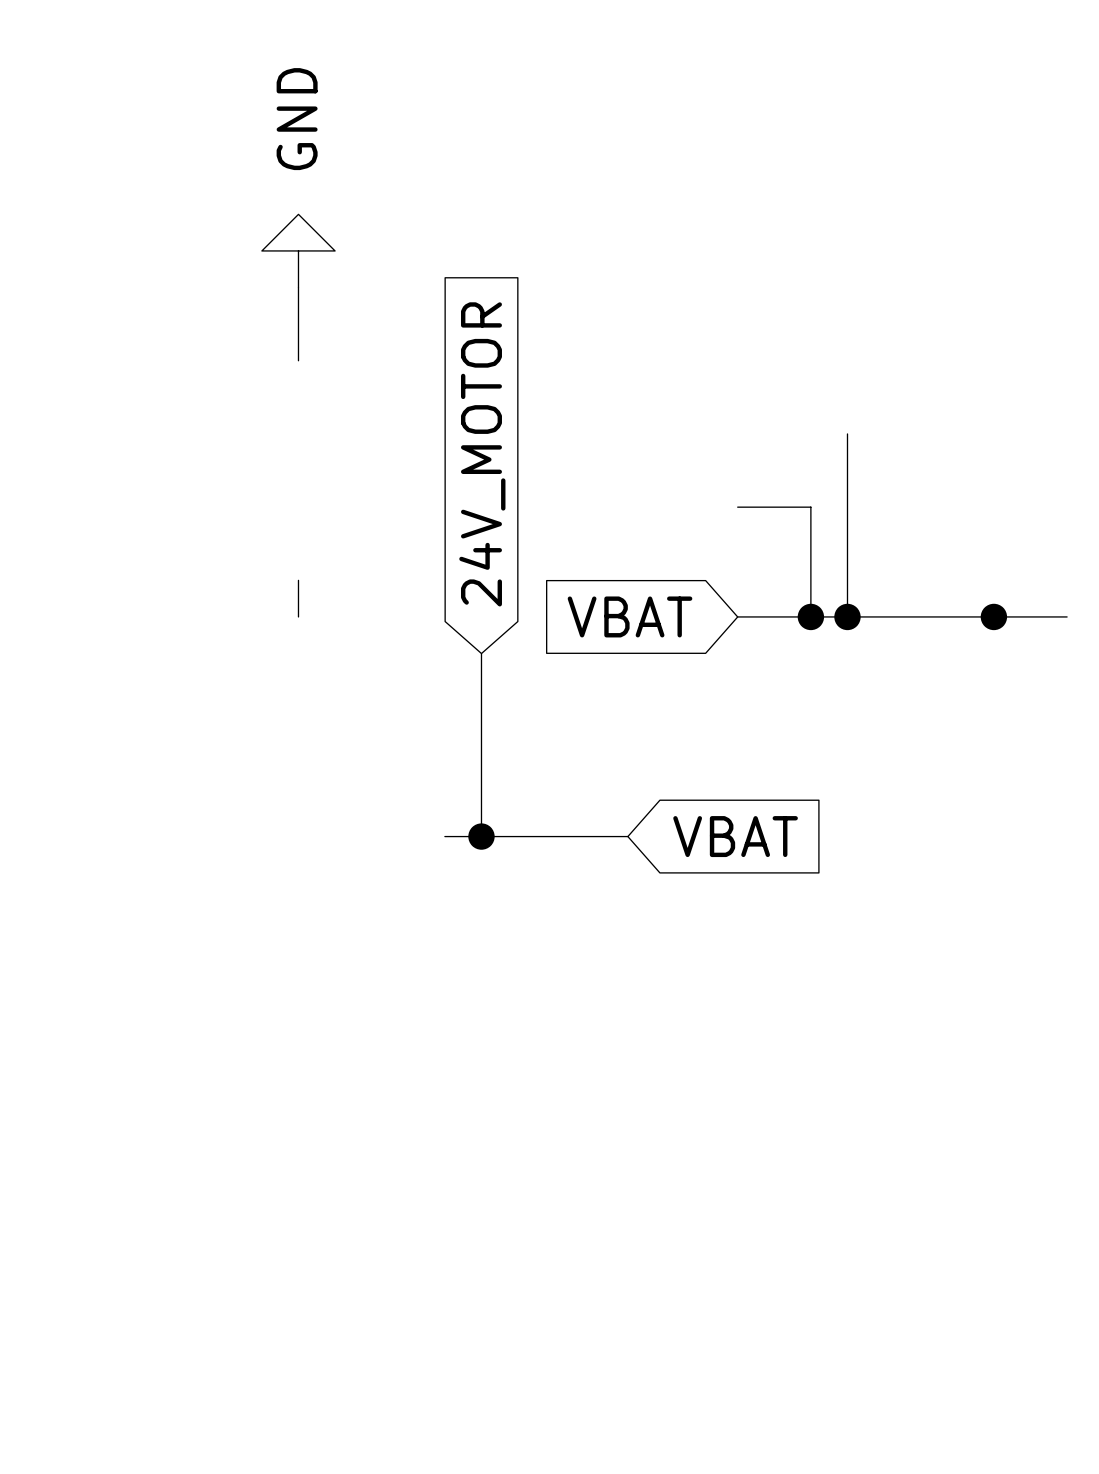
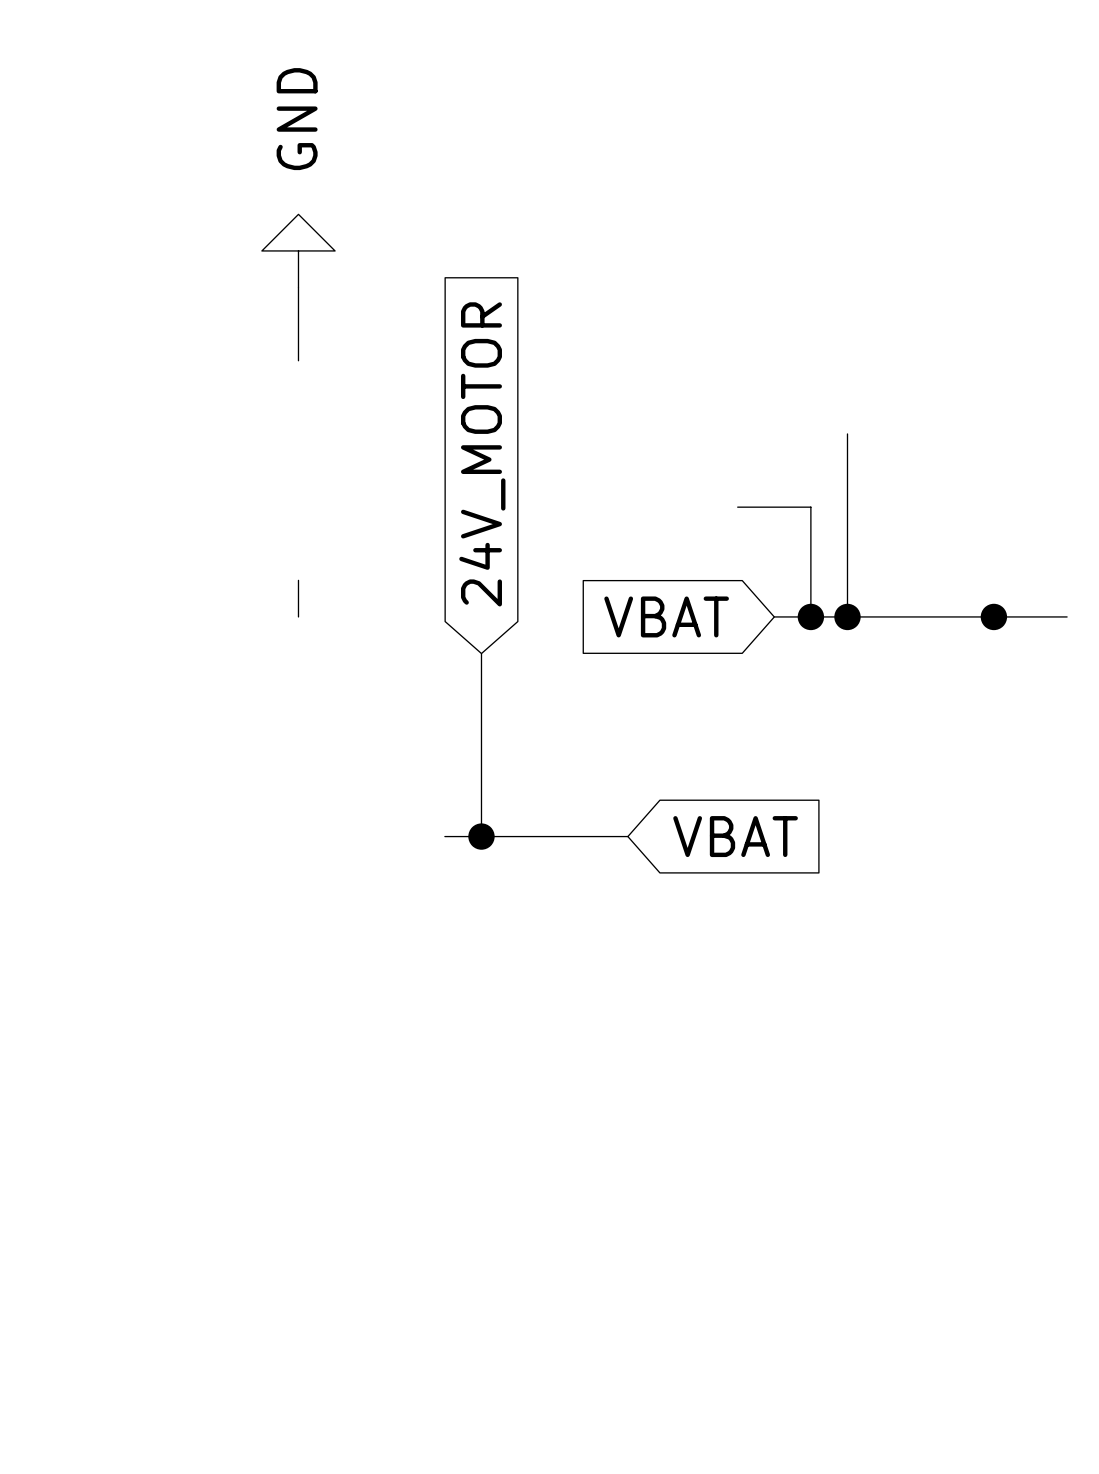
global label position: VBAT (630, 616) -> VBAT (666, 616)
wire: (737, 616) (774, 616) -> none

